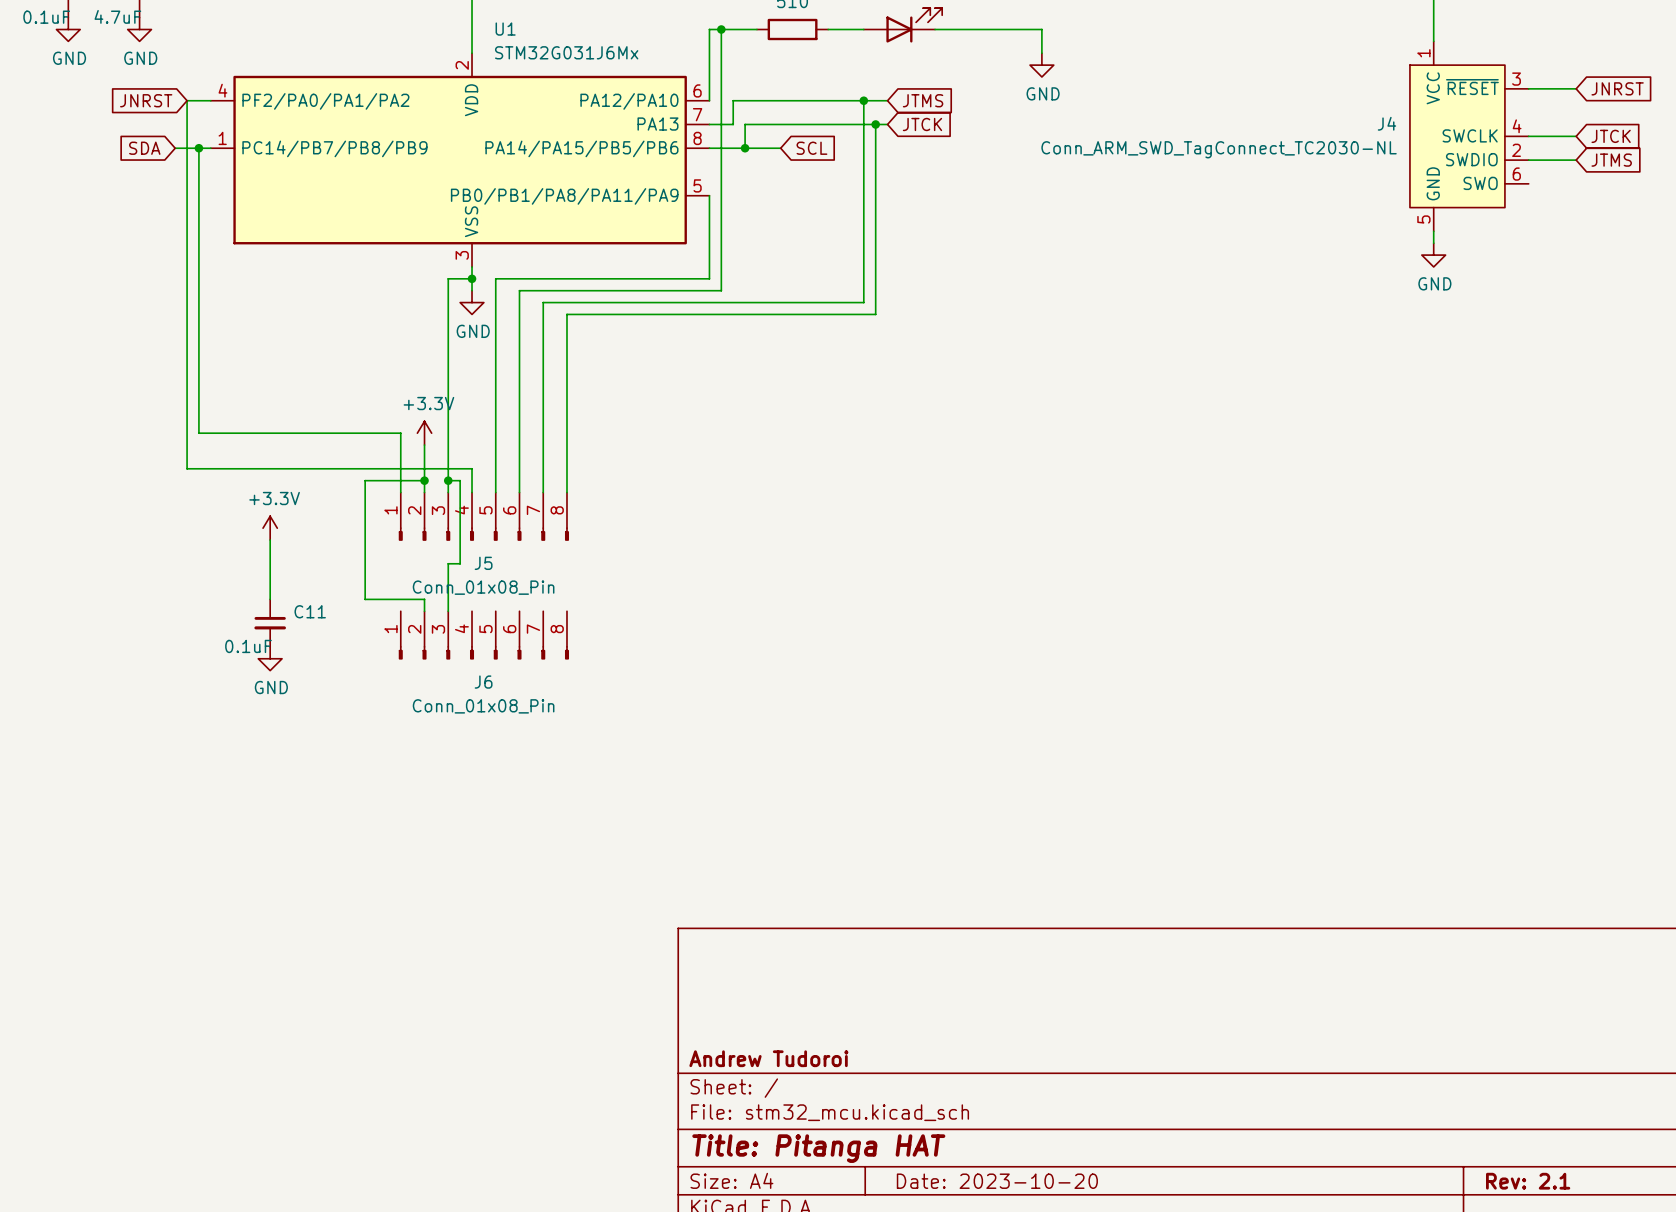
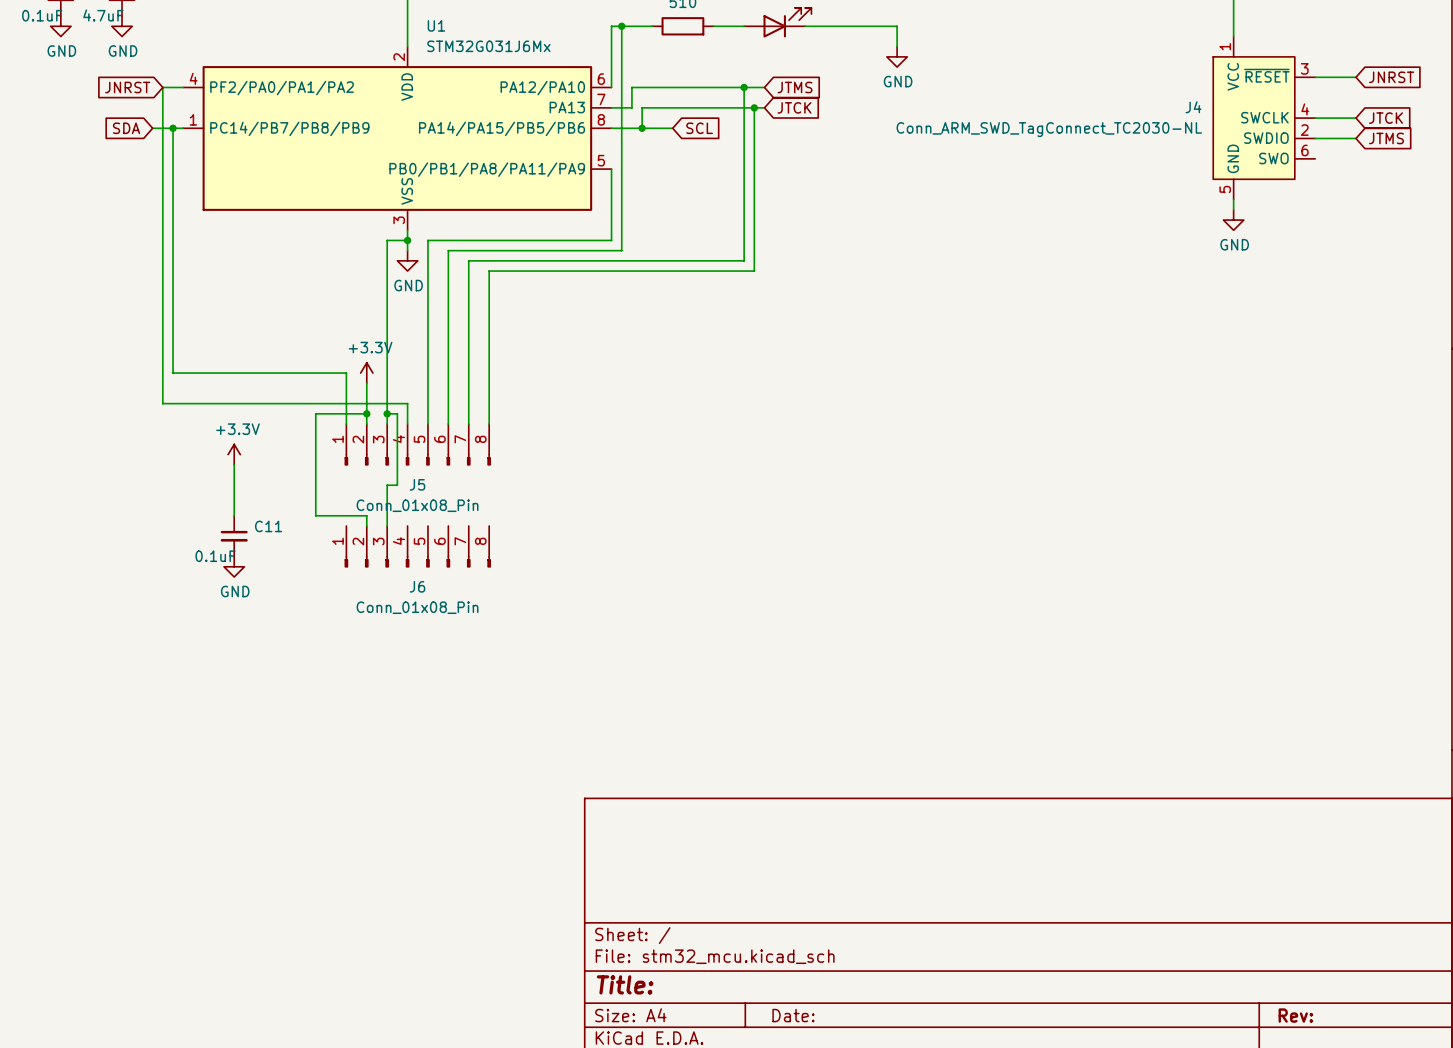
title block: Andrew Tudoroi (768, 1058) -> none
title block: Title: Pitanga HAT (818, 1148) -> Title: (625, 984)
title block: Date: 2023-10-20 (997, 1181) -> Date: (793, 1015)
title block: Rev: 2.1 (1528, 1181) -> Rev: (1295, 1015)

